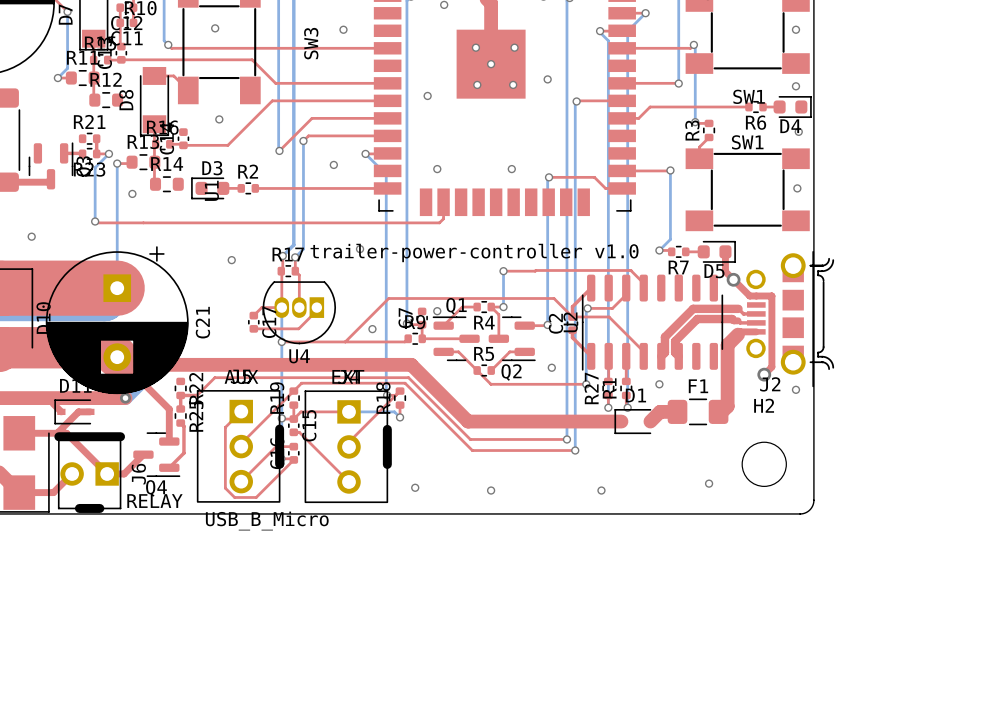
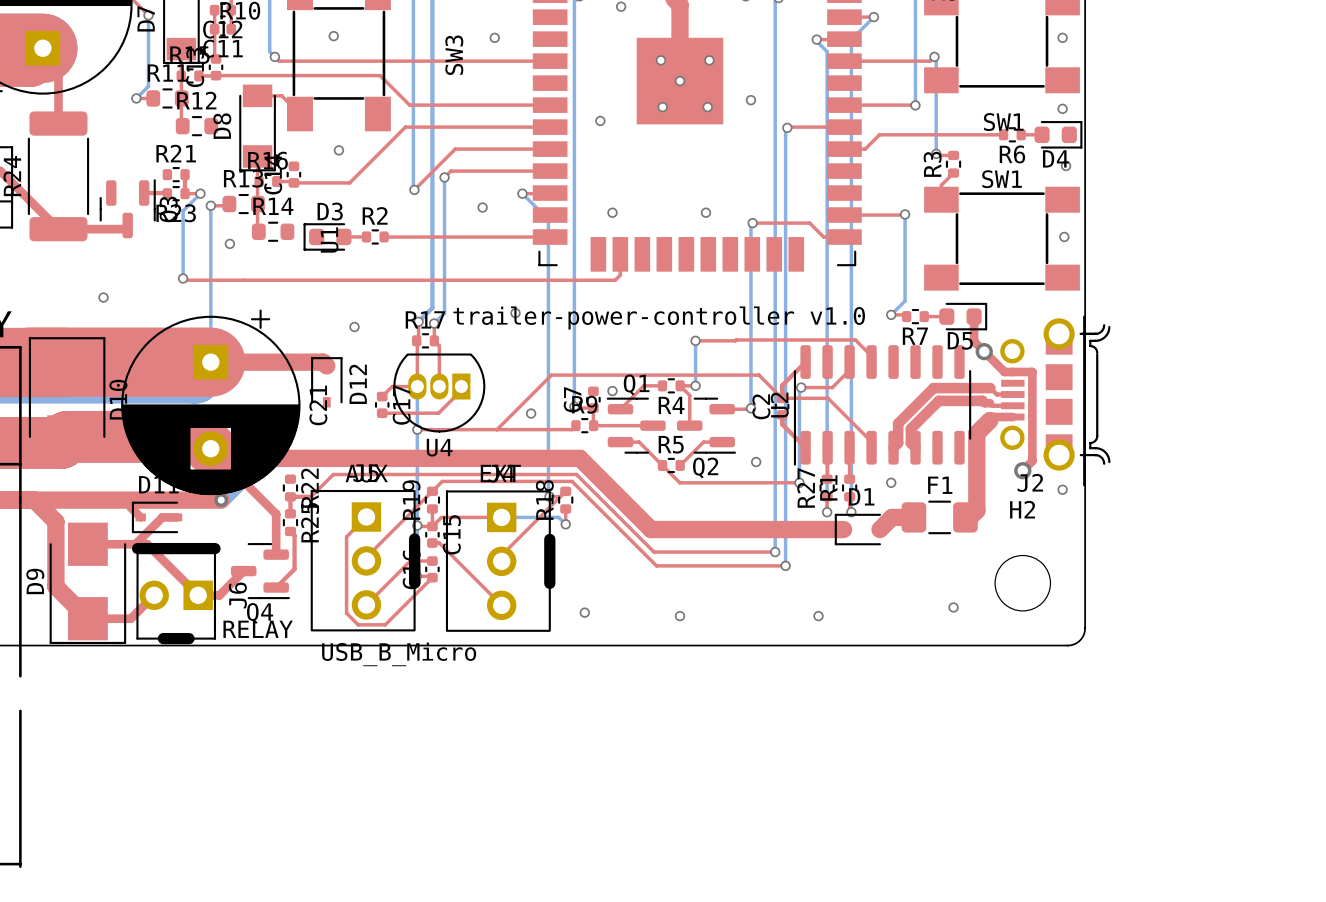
top track: none -> (210, 362) (323, 362) (326, 365)
D12: none -> (326, 382)

